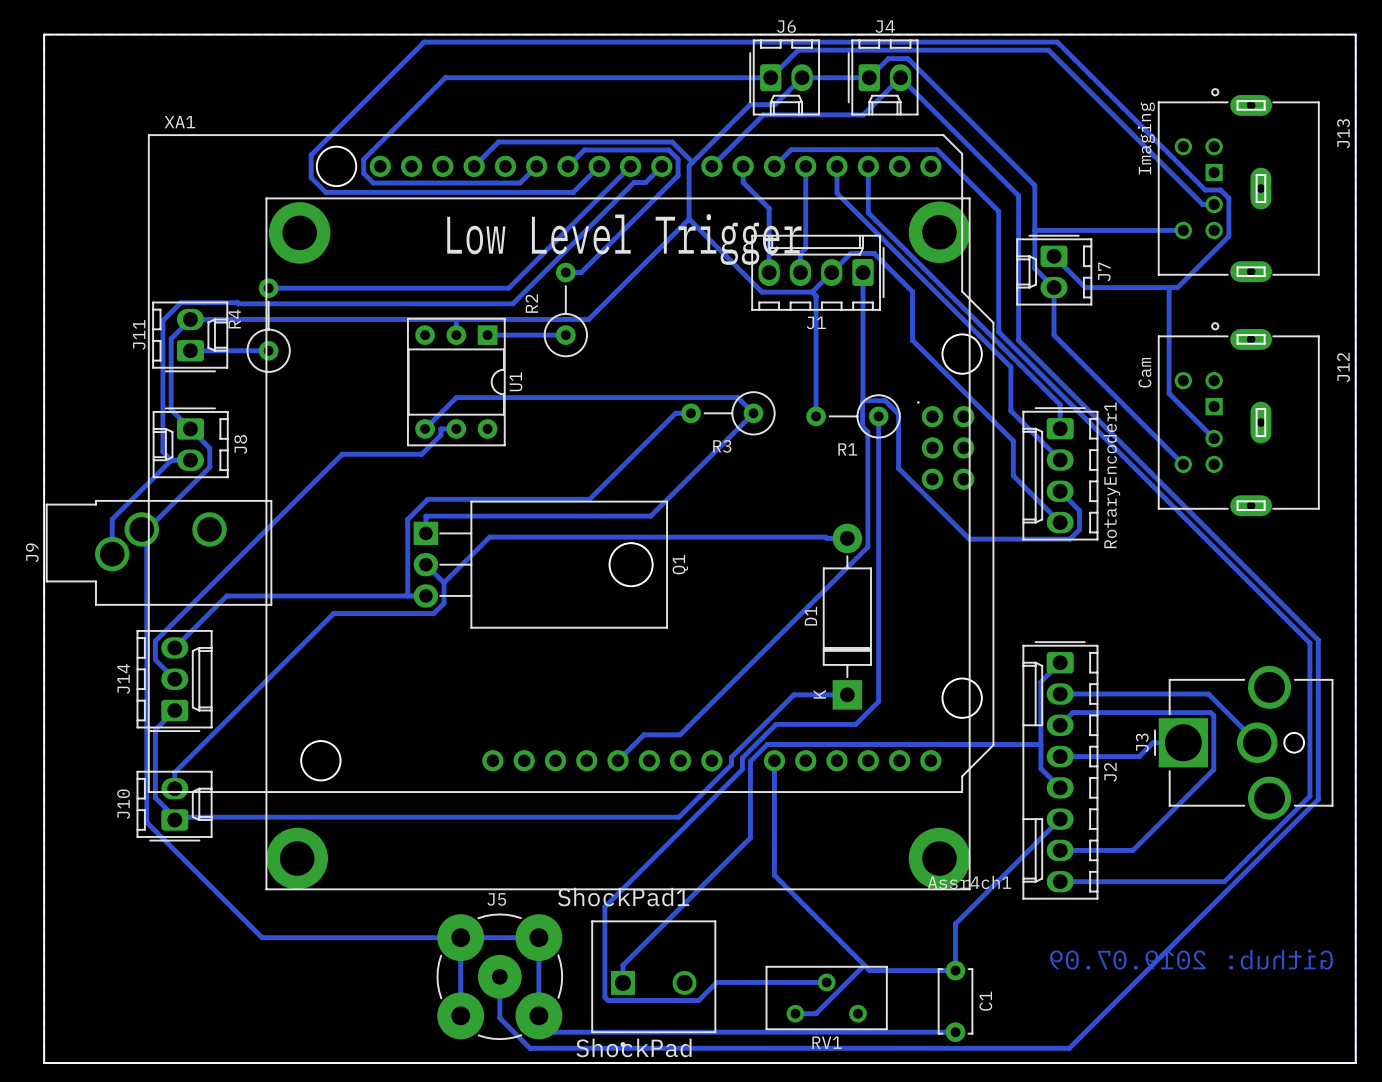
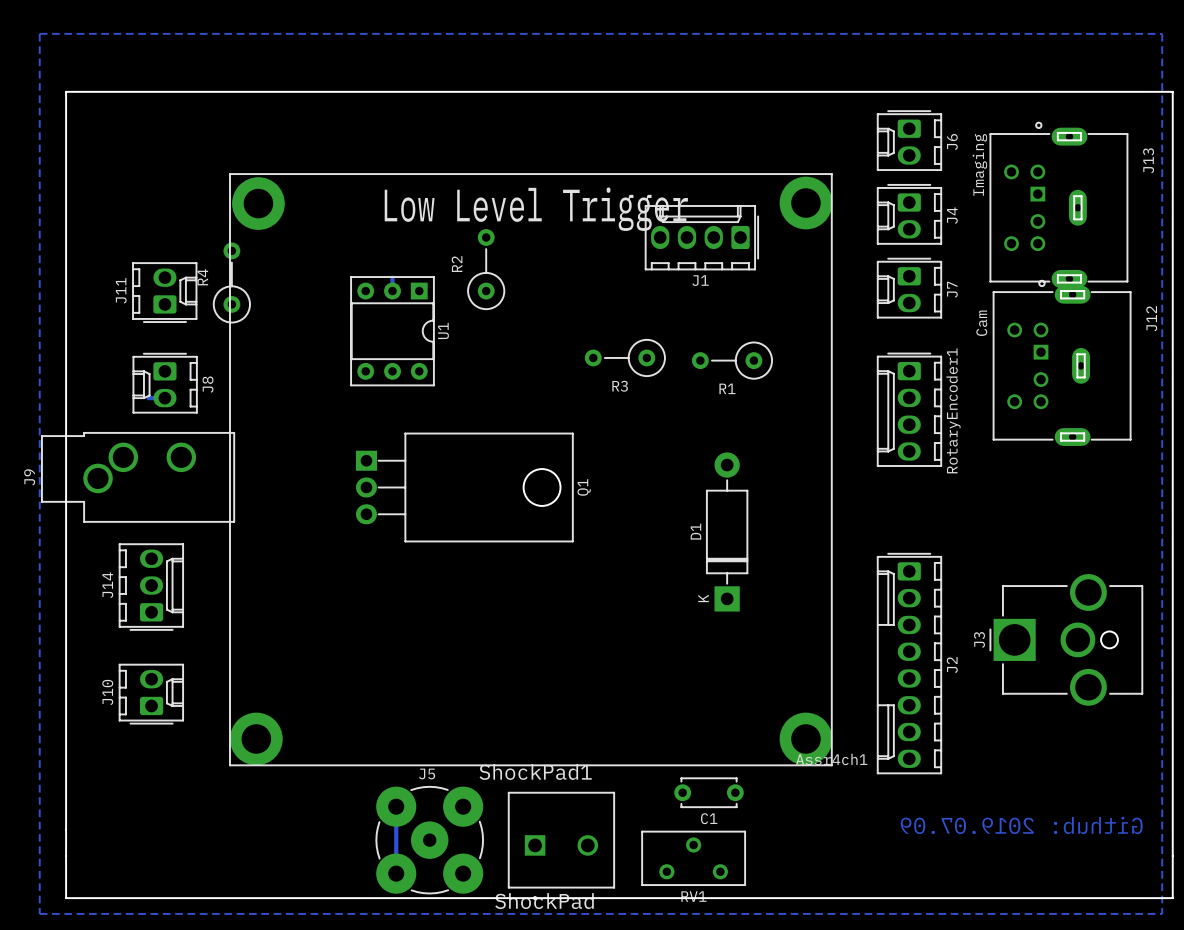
board edge: (44, 34) (44, 1062) (1355, 1062) (1355, 34) (44, 34) -> (66, 91) (66, 898) (1172, 898) (1172, 91) (66, 91)
J6 rotation: 0° (784, 77) -> 90° clockwise (909, 140)
J6 position: (784, 77) -> (909, 140)
J4 rotation: 0° (883, 77) -> 90° clockwise (909, 214)
J4 position: (883, 77) -> (909, 214)
bottom track: (692, 162) (672, 142) (498, 142) (474, 166) -> none
bottom track: (536, 166) (520, 183) (373, 183) (363, 173) (363, 159) (445, 77) (770, 77) (798, 50) (1048, 50) (1202, 204) (1214, 204) -> none
bottom track: (567, 166) (584, 150) (668, 150) (678, 159) (678, 175) (581, 272) (565, 272) -> none
bottom track: (599, 166) (573, 192) (325, 192) (311, 177) (311, 155) (424, 42) (1057, 42) (1205, 190) (1220, 190) (1228, 198) (1228, 236) (1177, 287) (1085, 287) (1054, 256) -> none
bottom track: (630, 166) (508, 288) (268, 288) -> none
bottom track: (661, 166) (645, 182) (634, 182) (512, 303) (180, 302) (162, 320) (162, 451) (171, 460) (112, 519) (112, 554) -> none
bottom track: (711, 166) (763, 114) (863, 114) (900, 77) (1018, 195) (1018, 340) (1318, 640) (1318, 799) (1069, 1048) (530, 1048) (499, 1018) (499, 976) -> none
bottom track: (743, 166) (743, 182) (769, 208) (769, 272) -> none
bottom track: (774, 166) (791, 149) (937, 149) (998, 211) (998, 331) (1309, 643) (1309, 796) (1224, 881) (1060, 881) -> none
bottom track: (805, 166) (805, 248) (800, 253) (800, 272) -> none
bottom track: (837, 166) (837, 193) (1010, 367) (1010, 410) (1060, 460) -> none
bottom track: (868, 166) (868, 212) (1060, 404) (1060, 428) -> none
J13 position: (1238, 185) -> (1058, 205)
bottom track: (689, 219) (689, 165) (750, 104) (775, 104) (802, 77) (869, 77) (888, 58) (907, 58) (1034, 185) (1034, 268) (1054, 287) (1054, 335) (1183, 464) -> none
bottom track: (689, 219) (588, 319) (190, 319) (171, 338) (171, 409) (209, 448) (209, 467) (147, 529) (141, 529) -> none
bottom track: (689, 219) (762, 292) (812, 292) -> none
bottom track: (1034, 230) (1183, 230) -> none
J7 position: (1054, 270) -> (909, 288)
bottom track: (863, 272) (863, 400) -> none
bottom track: (1169, 287) (1169, 393) (1214, 438) -> none
bottom track: (812, 292) (850, 253) (874, 253) (912, 291) (912, 340) (1013, 441) (1013, 475) (1060, 522) -> none
bottom track: (812, 292) (816, 295) (816, 416) -> none
bottom track: (487, 335) (565, 335) -> none
bottom track: (190, 350) (268, 350) -> none
bottom track: (863, 400) (862, 426) (867, 431) (867, 547) (680, 734) (643, 734) (618, 760) -> none
bottom track: (863, 400) (885, 400) (898, 414) (898, 468) (969, 539) (1070, 539) (1079, 529) (1079, 510) (1060, 491) -> none
bottom track: (690, 413) (675, 413) (589, 499) (427, 499) (407, 519) (407, 595) -> none
bottom track: (878, 416) (878, 701) (855, 724) (776, 724) (742, 758) (742, 769) (604, 906) (604, 997) (608, 1000) (698, 1000) (716, 982) (826, 982) -> none
bottom track: (425, 428) (456, 397) (737, 397) (753, 413) (650, 516) (425, 516) (425, 533) -> none
bottom track: (456, 428) (440, 428) (440, 435) (421, 454) (342, 454) (155, 641) (155, 659) (174, 679) -> none
XA1: (571, 463) -> none
bottom track: (146, 529) (146, 822) (262, 937) (538, 937) (538, 1015) (555, 1032) (955, 1032) -> none
bottom track: (847, 538) (489, 537) (444, 582) -> none
bottom track: (425, 564) (444, 582) -> none
bottom track: (444, 582) (444, 603) (433, 613) (333, 613) (174, 772) (174, 788) -> none
bottom track: (425, 595) (226, 595) (174, 647) -> none
bottom track: (1060, 662) (1040, 681) (1040, 768) (1060, 787) -> none
bottom track: (847, 694) (793, 694) (731, 757) (731, 764) (679, 817) (174, 817) -> none
bottom track: (1060, 694) (1208, 694) (1257, 742) -> none
bottom track: (174, 710) (155, 729) (155, 797) (174, 817) -> none
bottom track: (1060, 725) (1072, 712) (1210, 712) (1213, 715) (1213, 769) (1133, 850) (1060, 850) -> none
bottom track: (1183, 742) (1153, 742) (1139, 756) (1060, 756) -> none
bottom track: (1040, 744) (767, 744) (750, 761) (750, 837) (622, 965) (622, 982) -> none
bottom track: (774, 760) (774, 875) (864, 965) -> none
bottom track: (1060, 819) (955, 923) (955, 970) (869, 970) (864, 965) -> none
bottom track: (864, 965) (815, 1013) (795, 1013) -> none
RV1 position: (826, 998) -> (693, 858)
C1 rotation: 0° (955, 1001) -> 90° clockwise (709, 792)
C1 position: (955, 1001) -> (709, 792)

